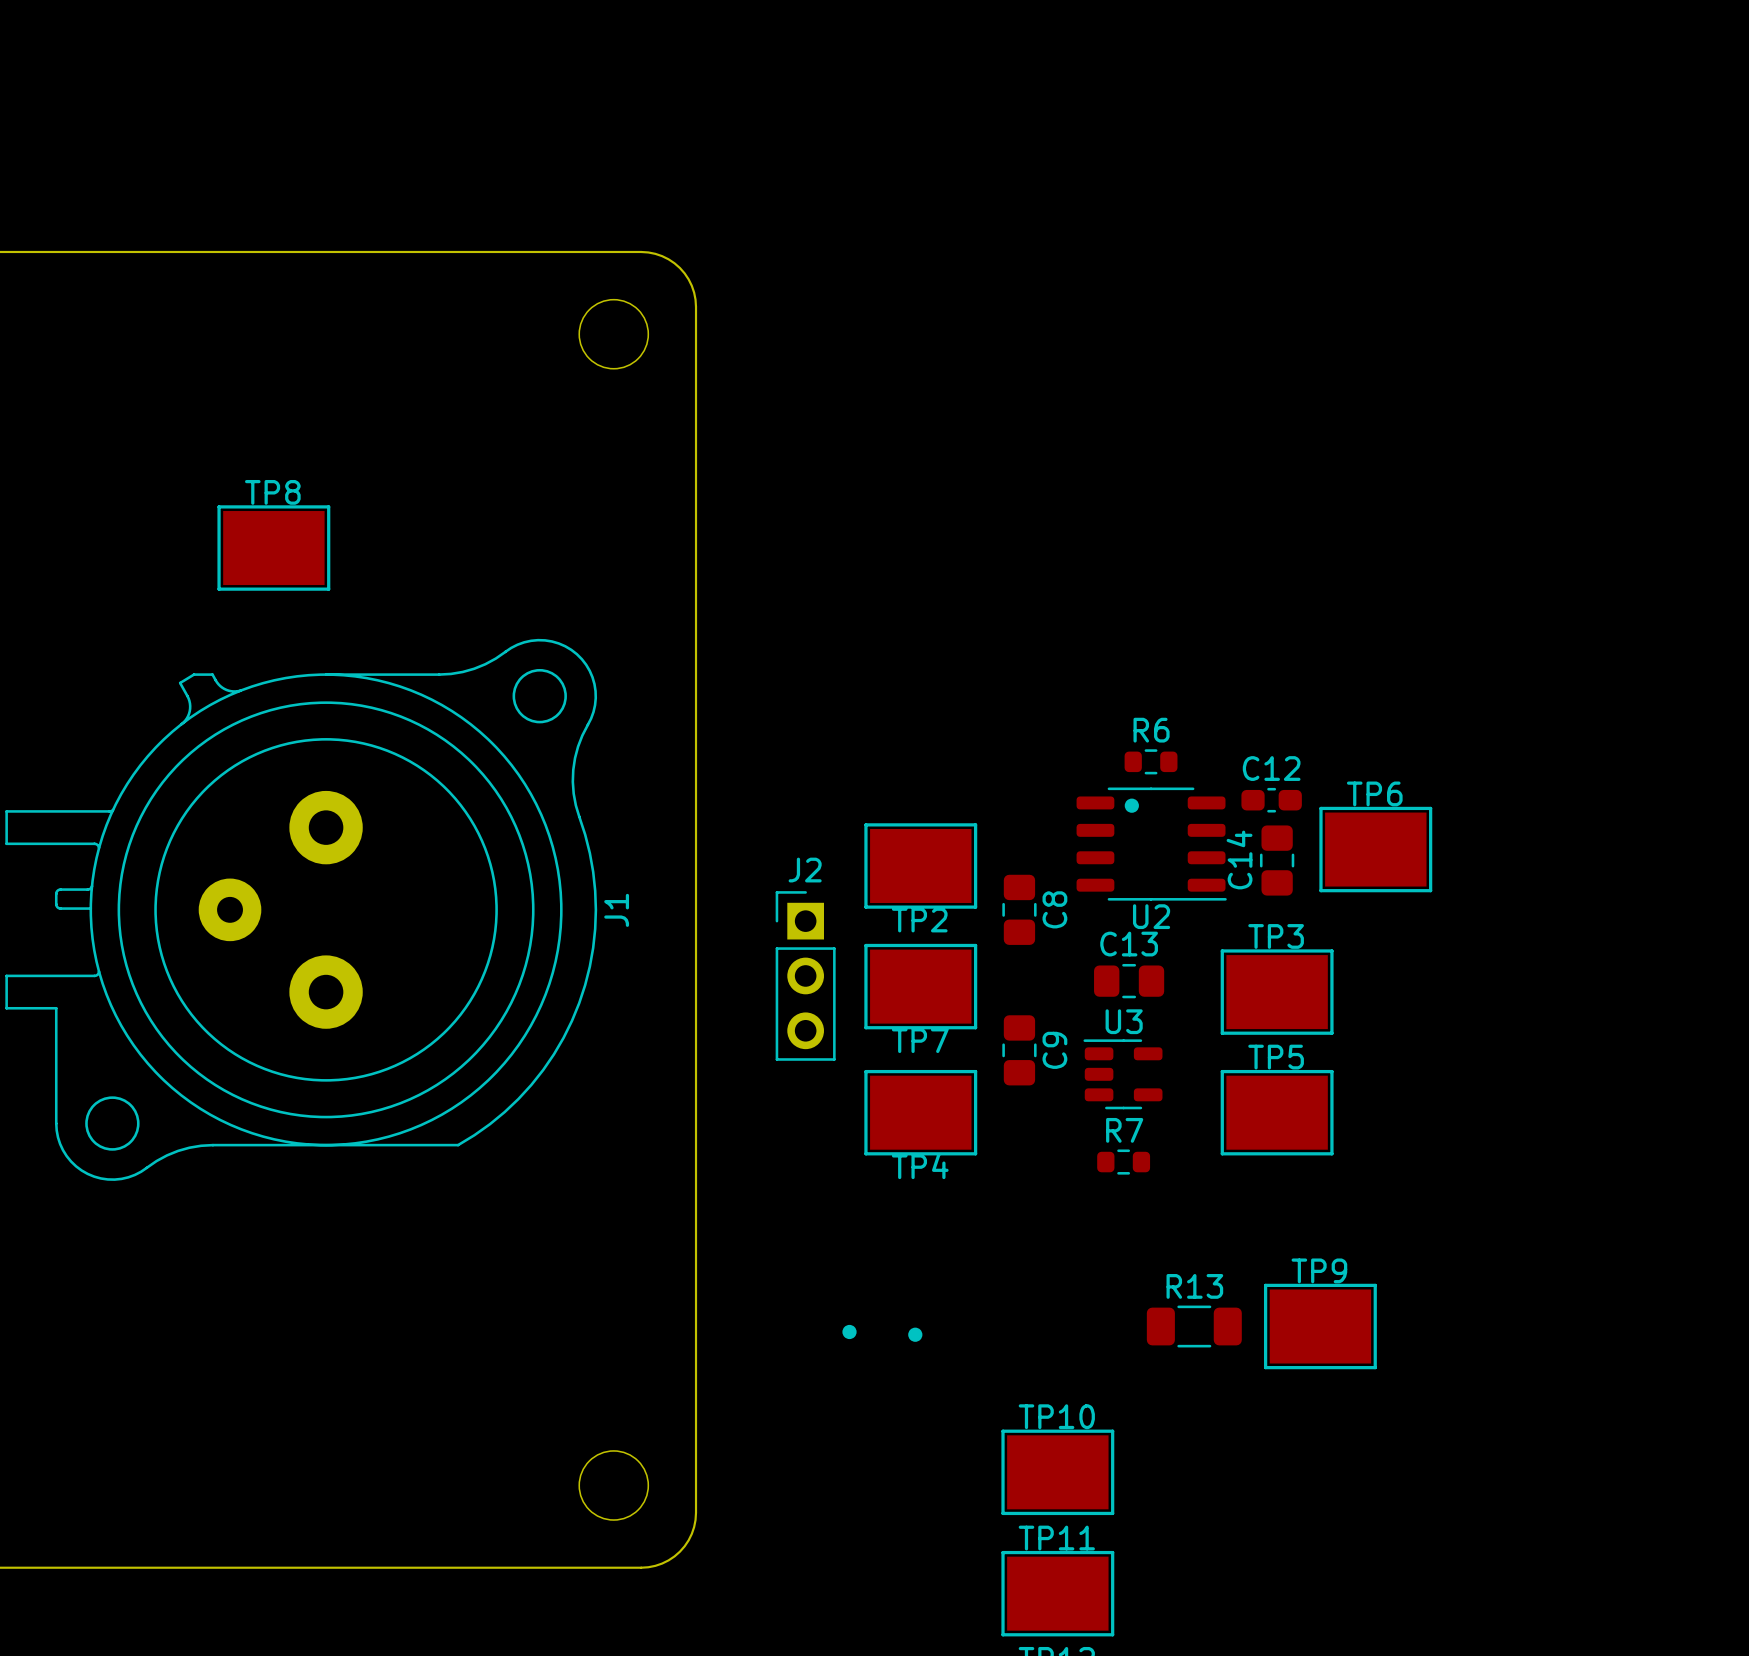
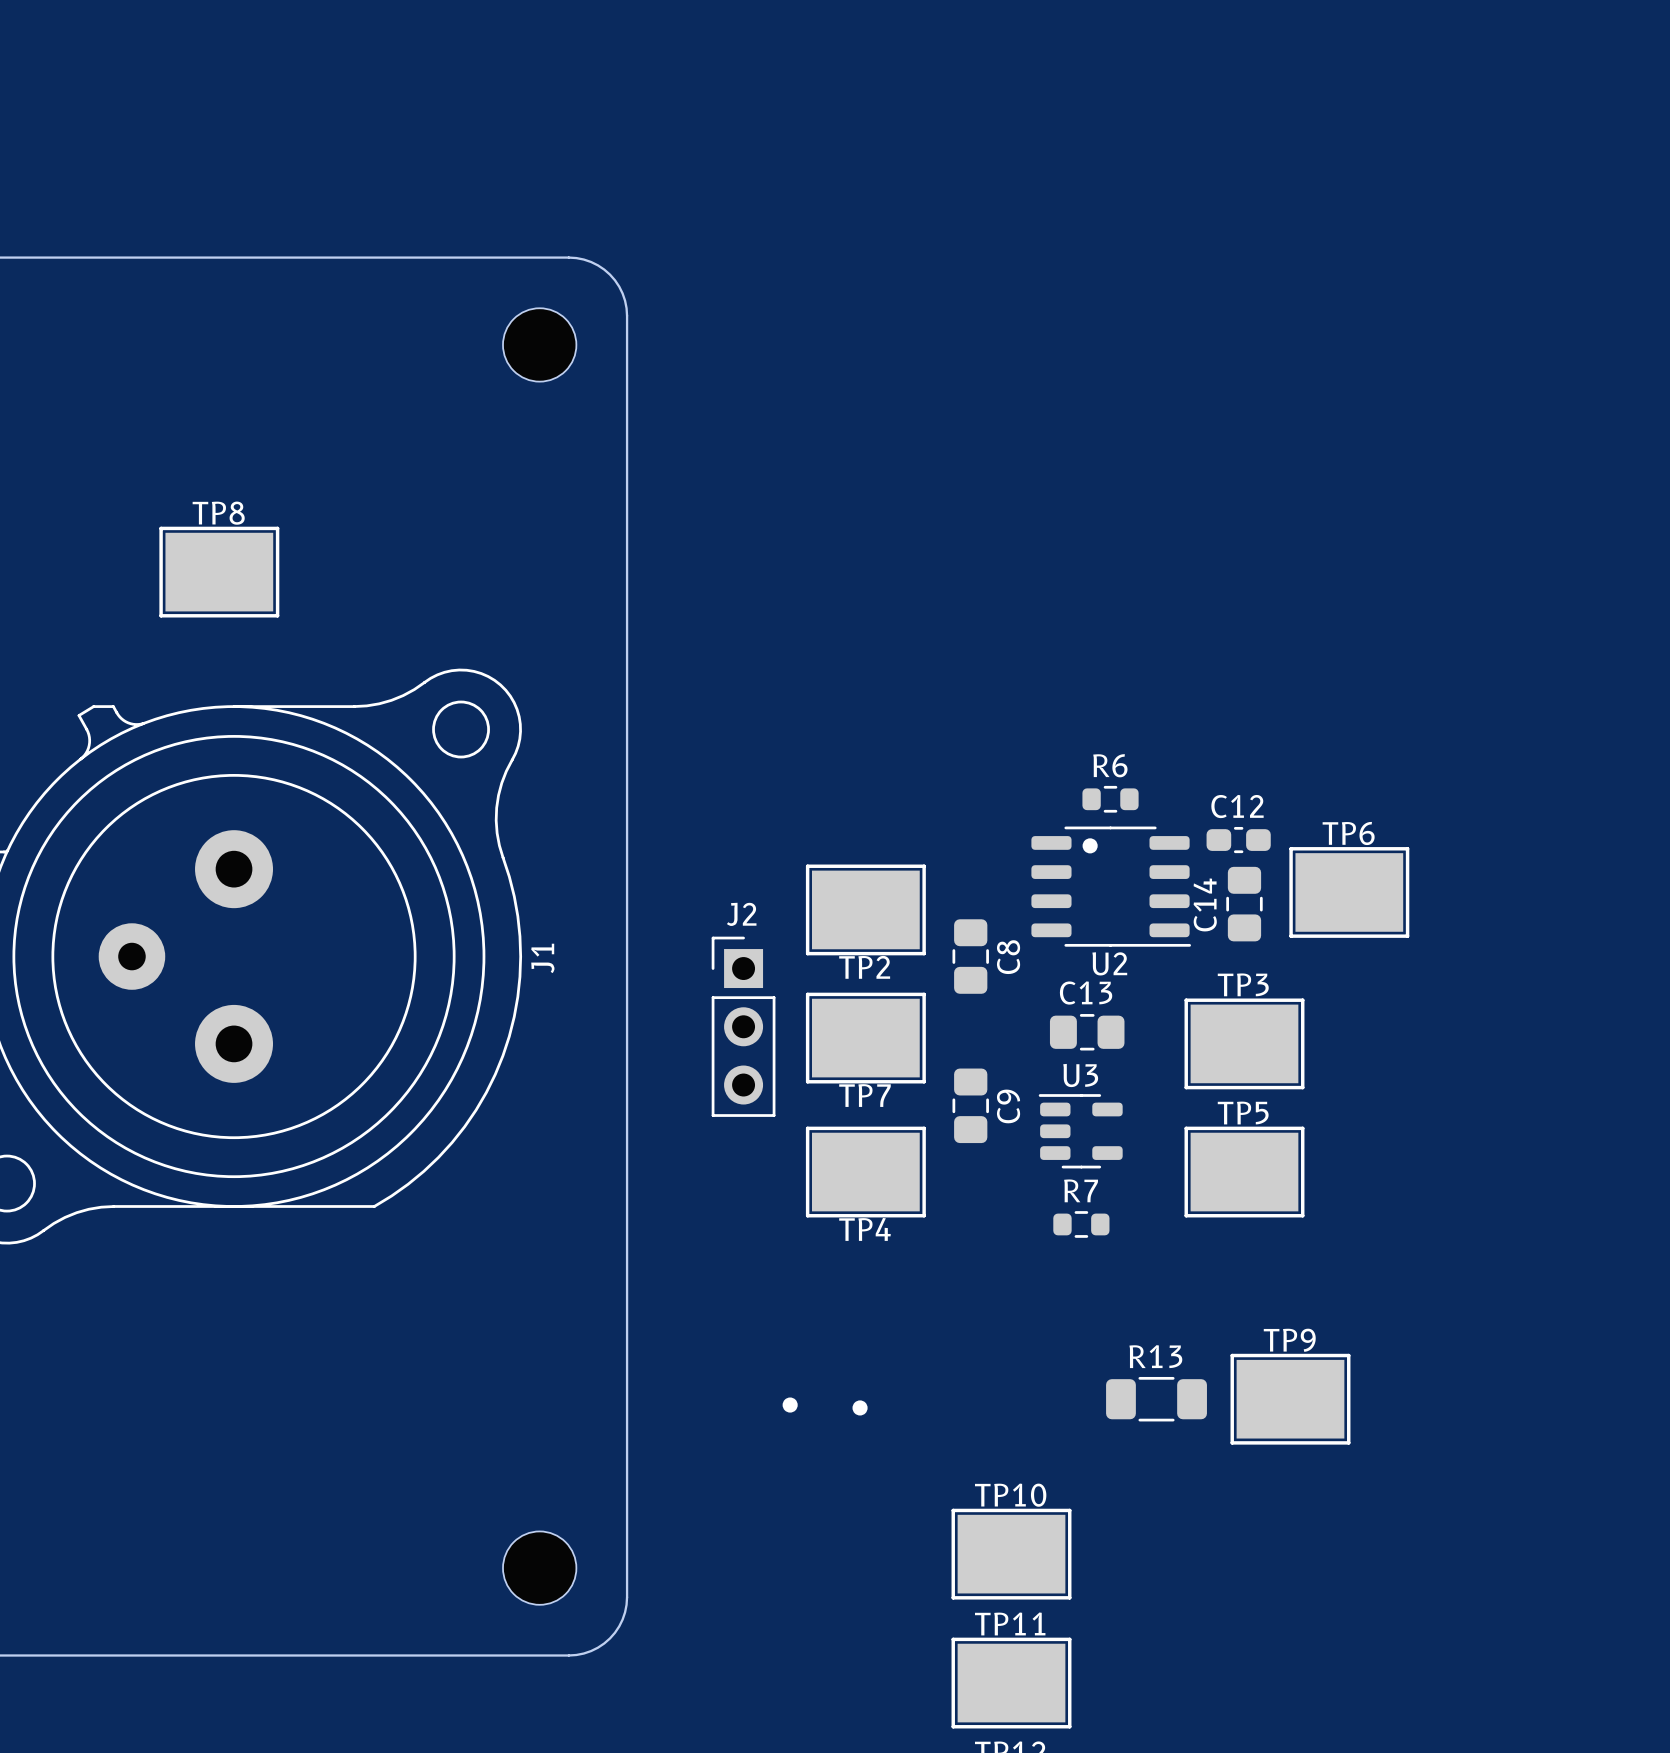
TP8 position: (273, 548) -> (219, 572)

